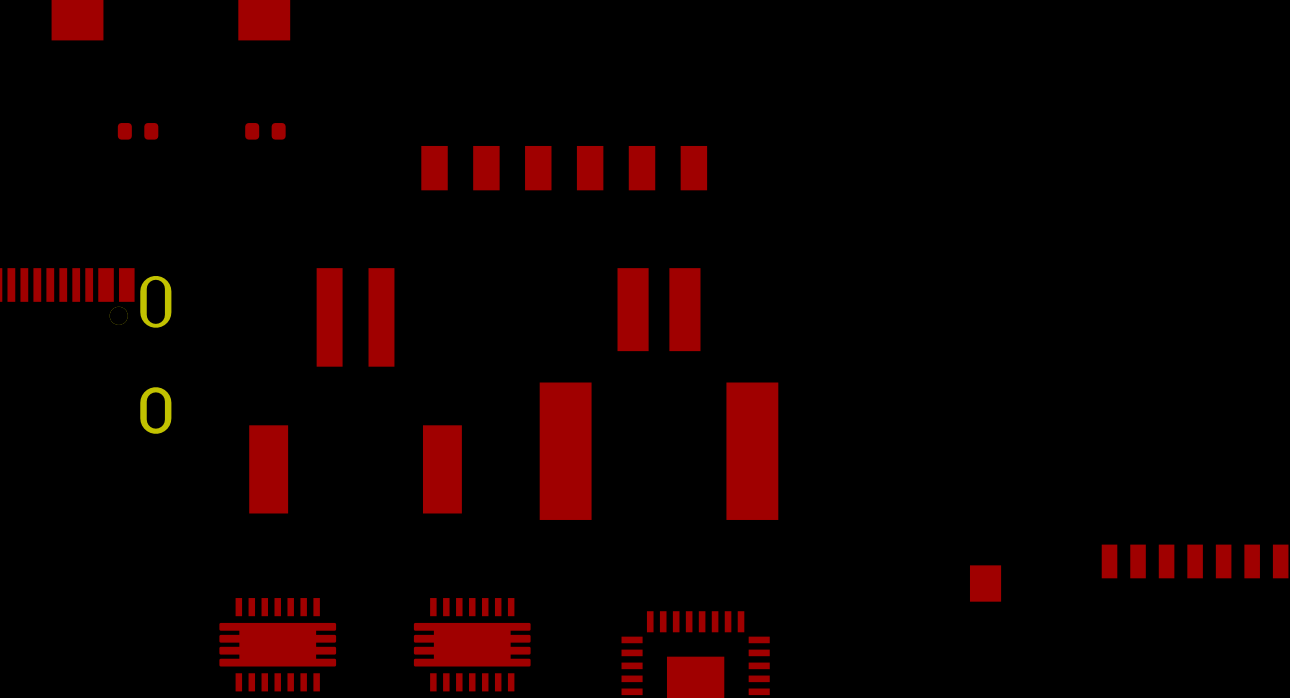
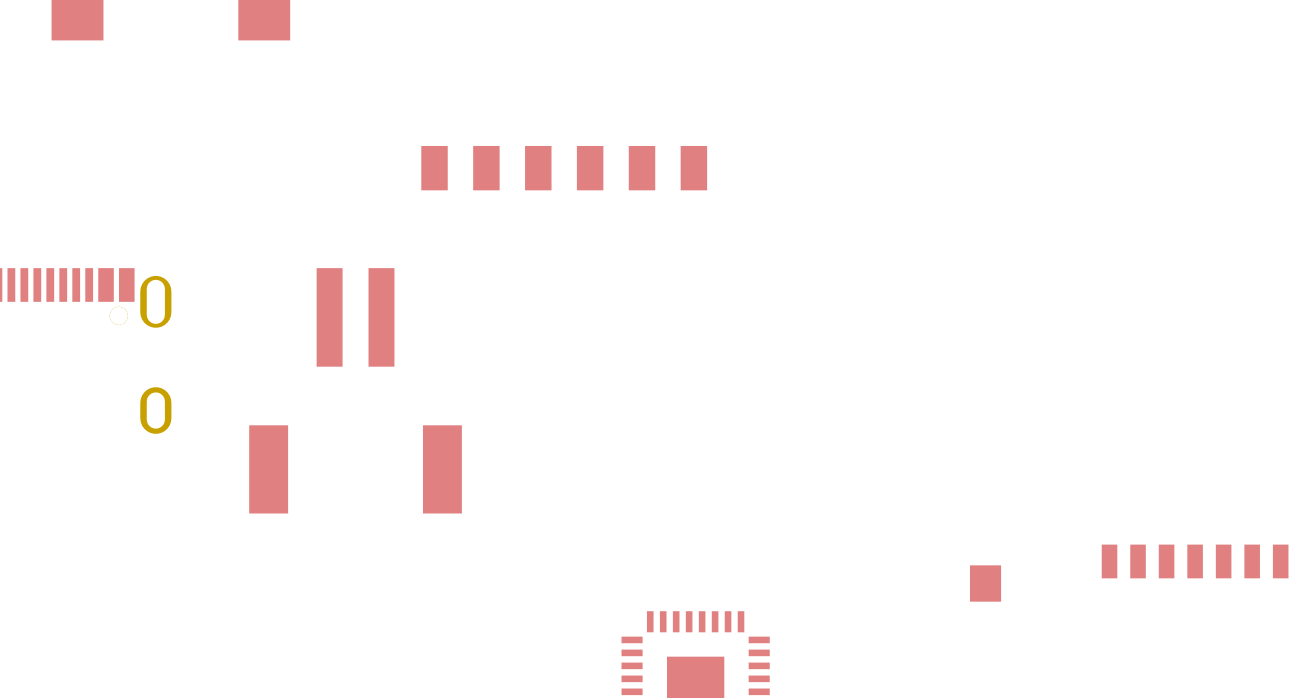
part: (138, 131) -> none
part: (265, 131) -> none
part: (659, 394) -> none
part: (277, 644) -> none
part: (472, 644) -> none

